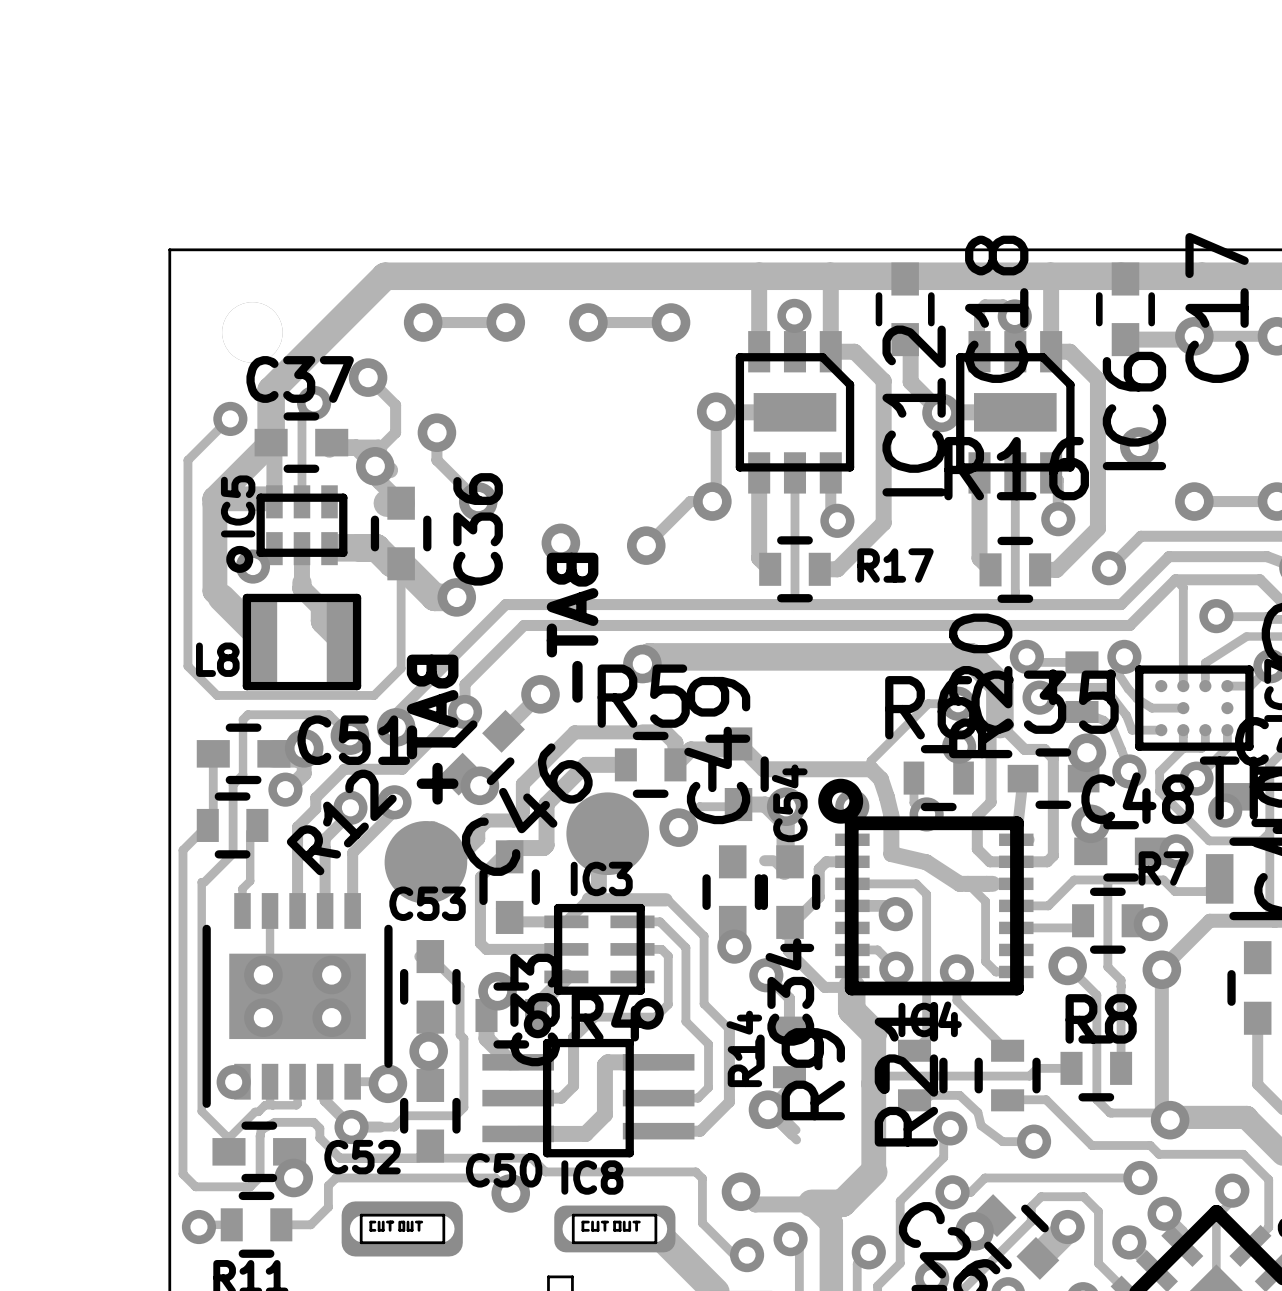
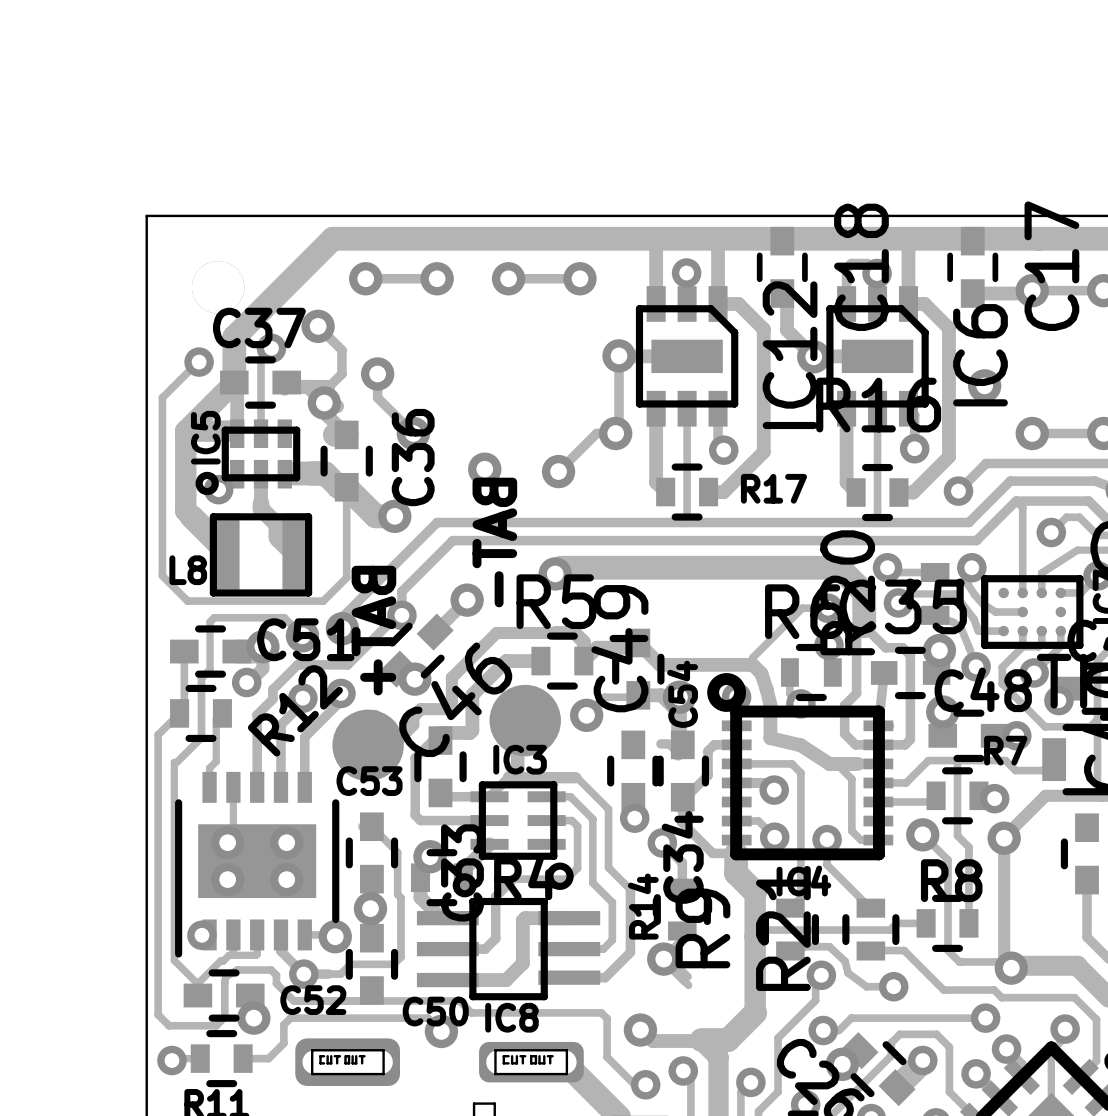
track: (1216, 616) (1267, 616) -> (1051, 532) (1066, 517) (1079, 517) (1095, 532)

